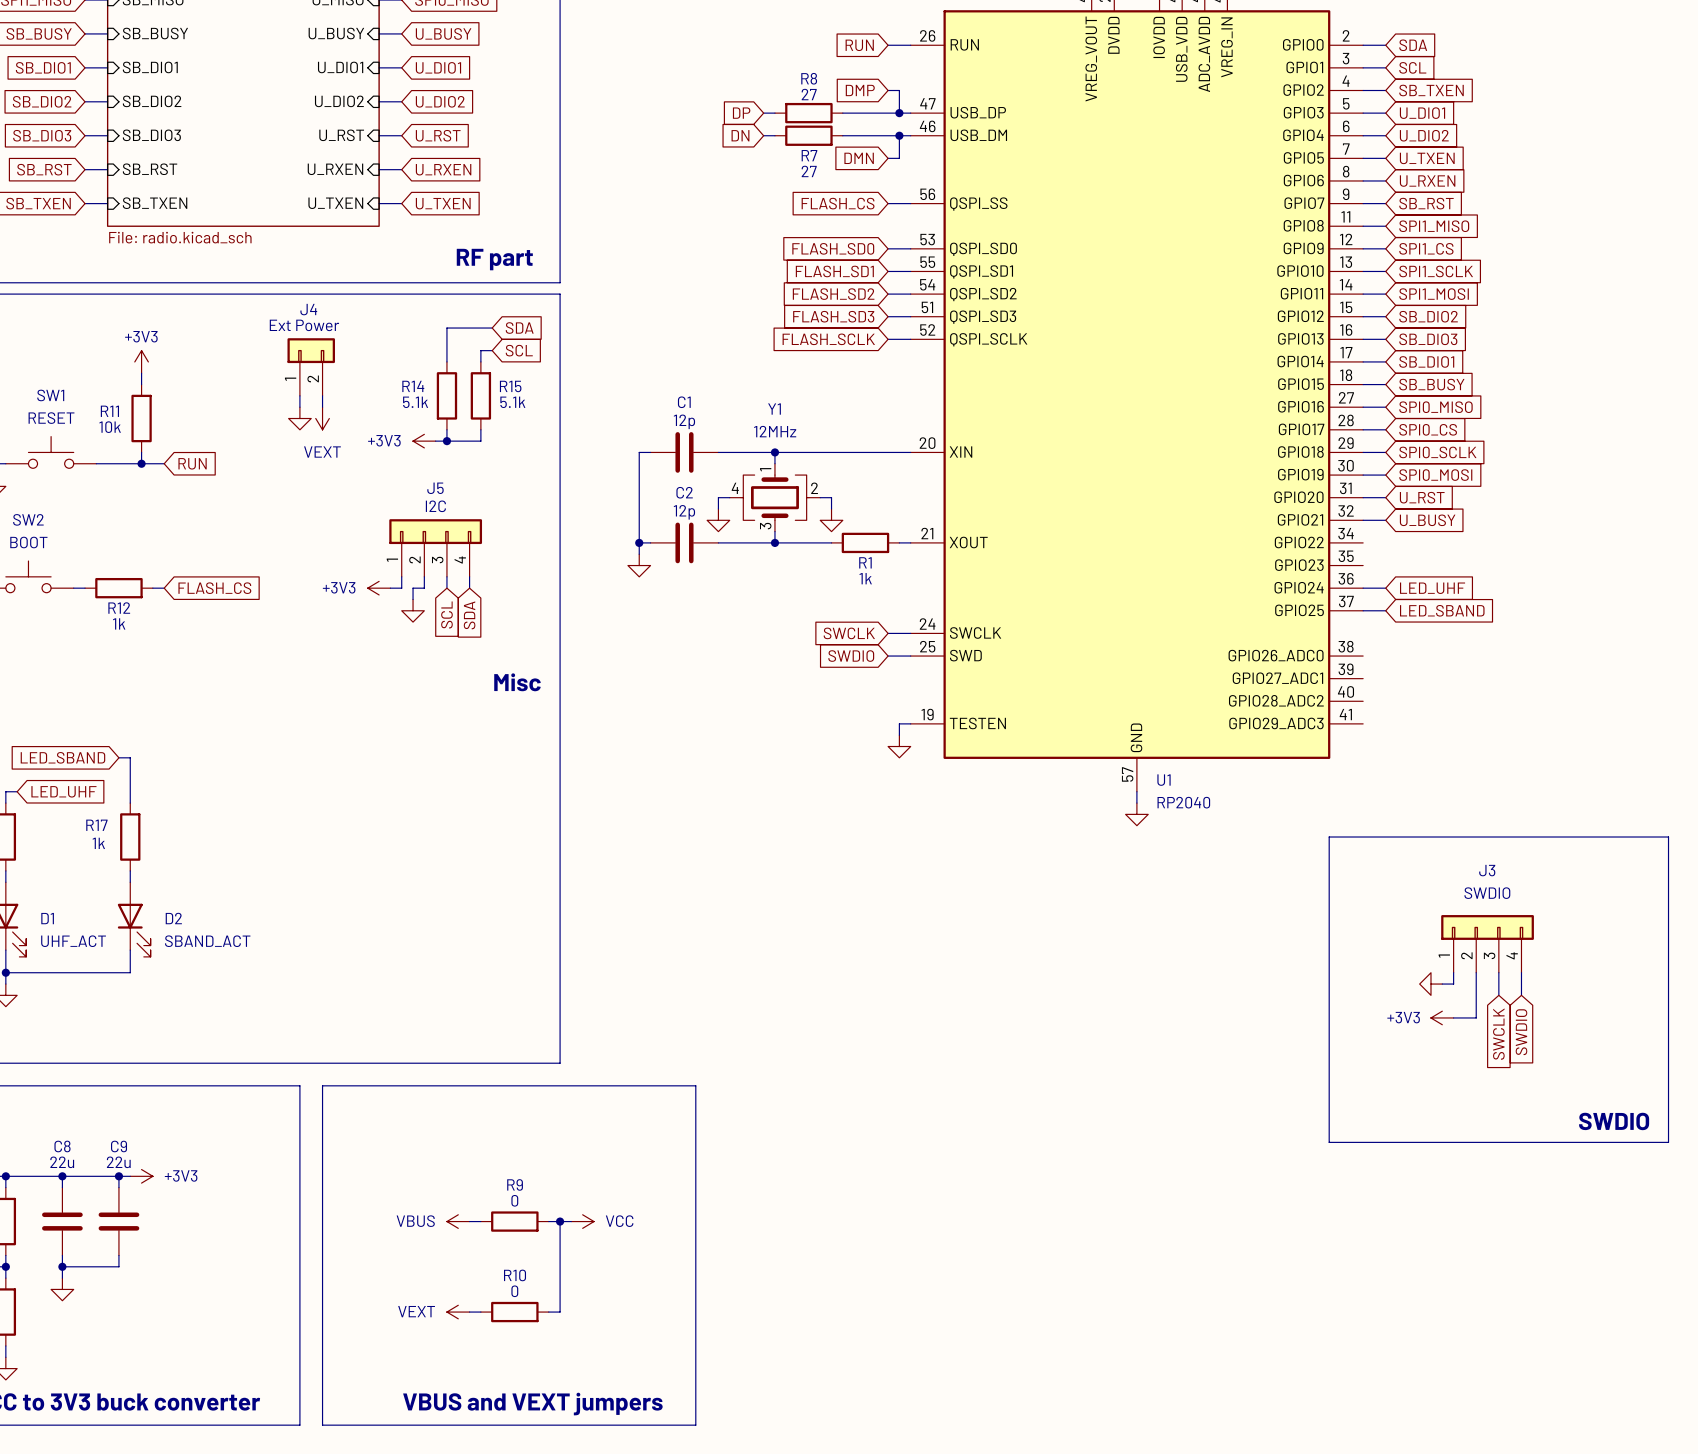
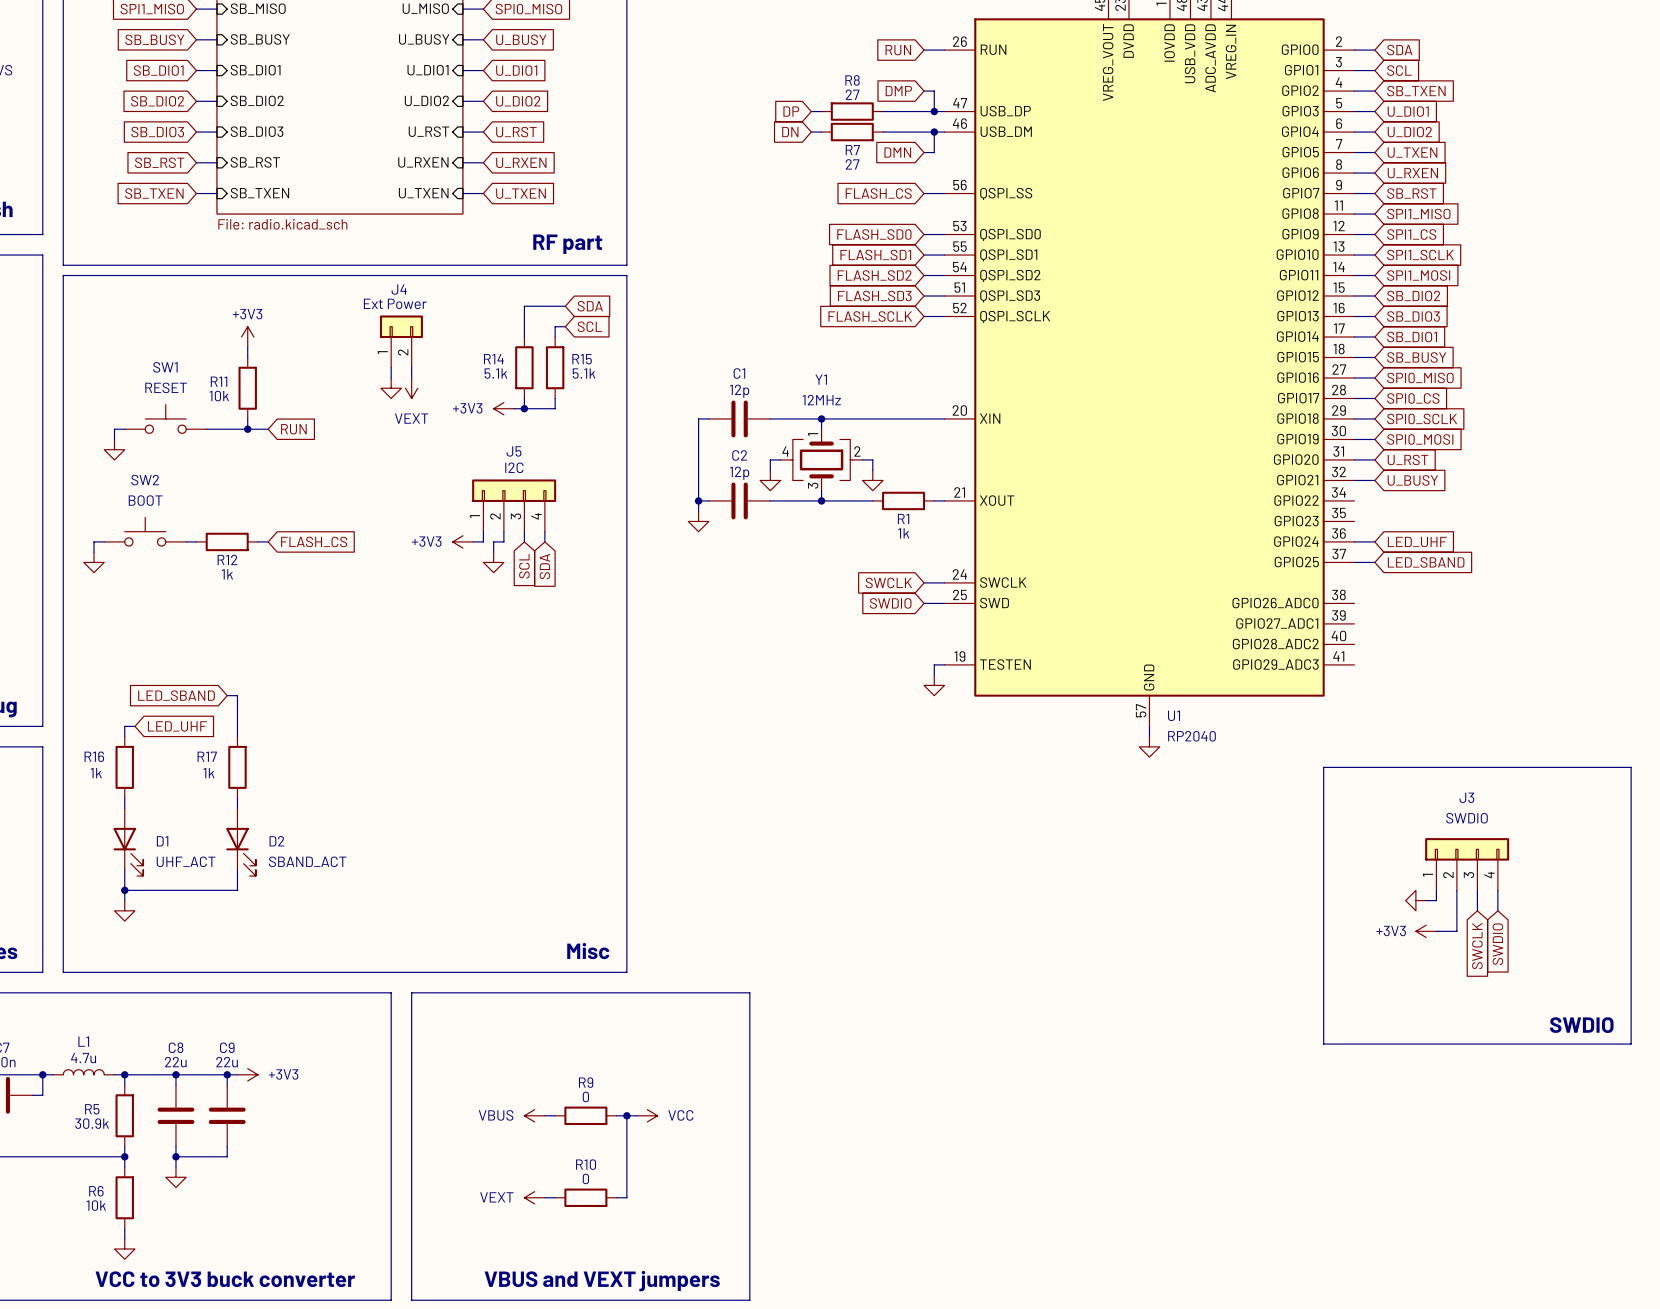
text: Misc (517, 682) -> none
text: none -> Misc (588, 951)

